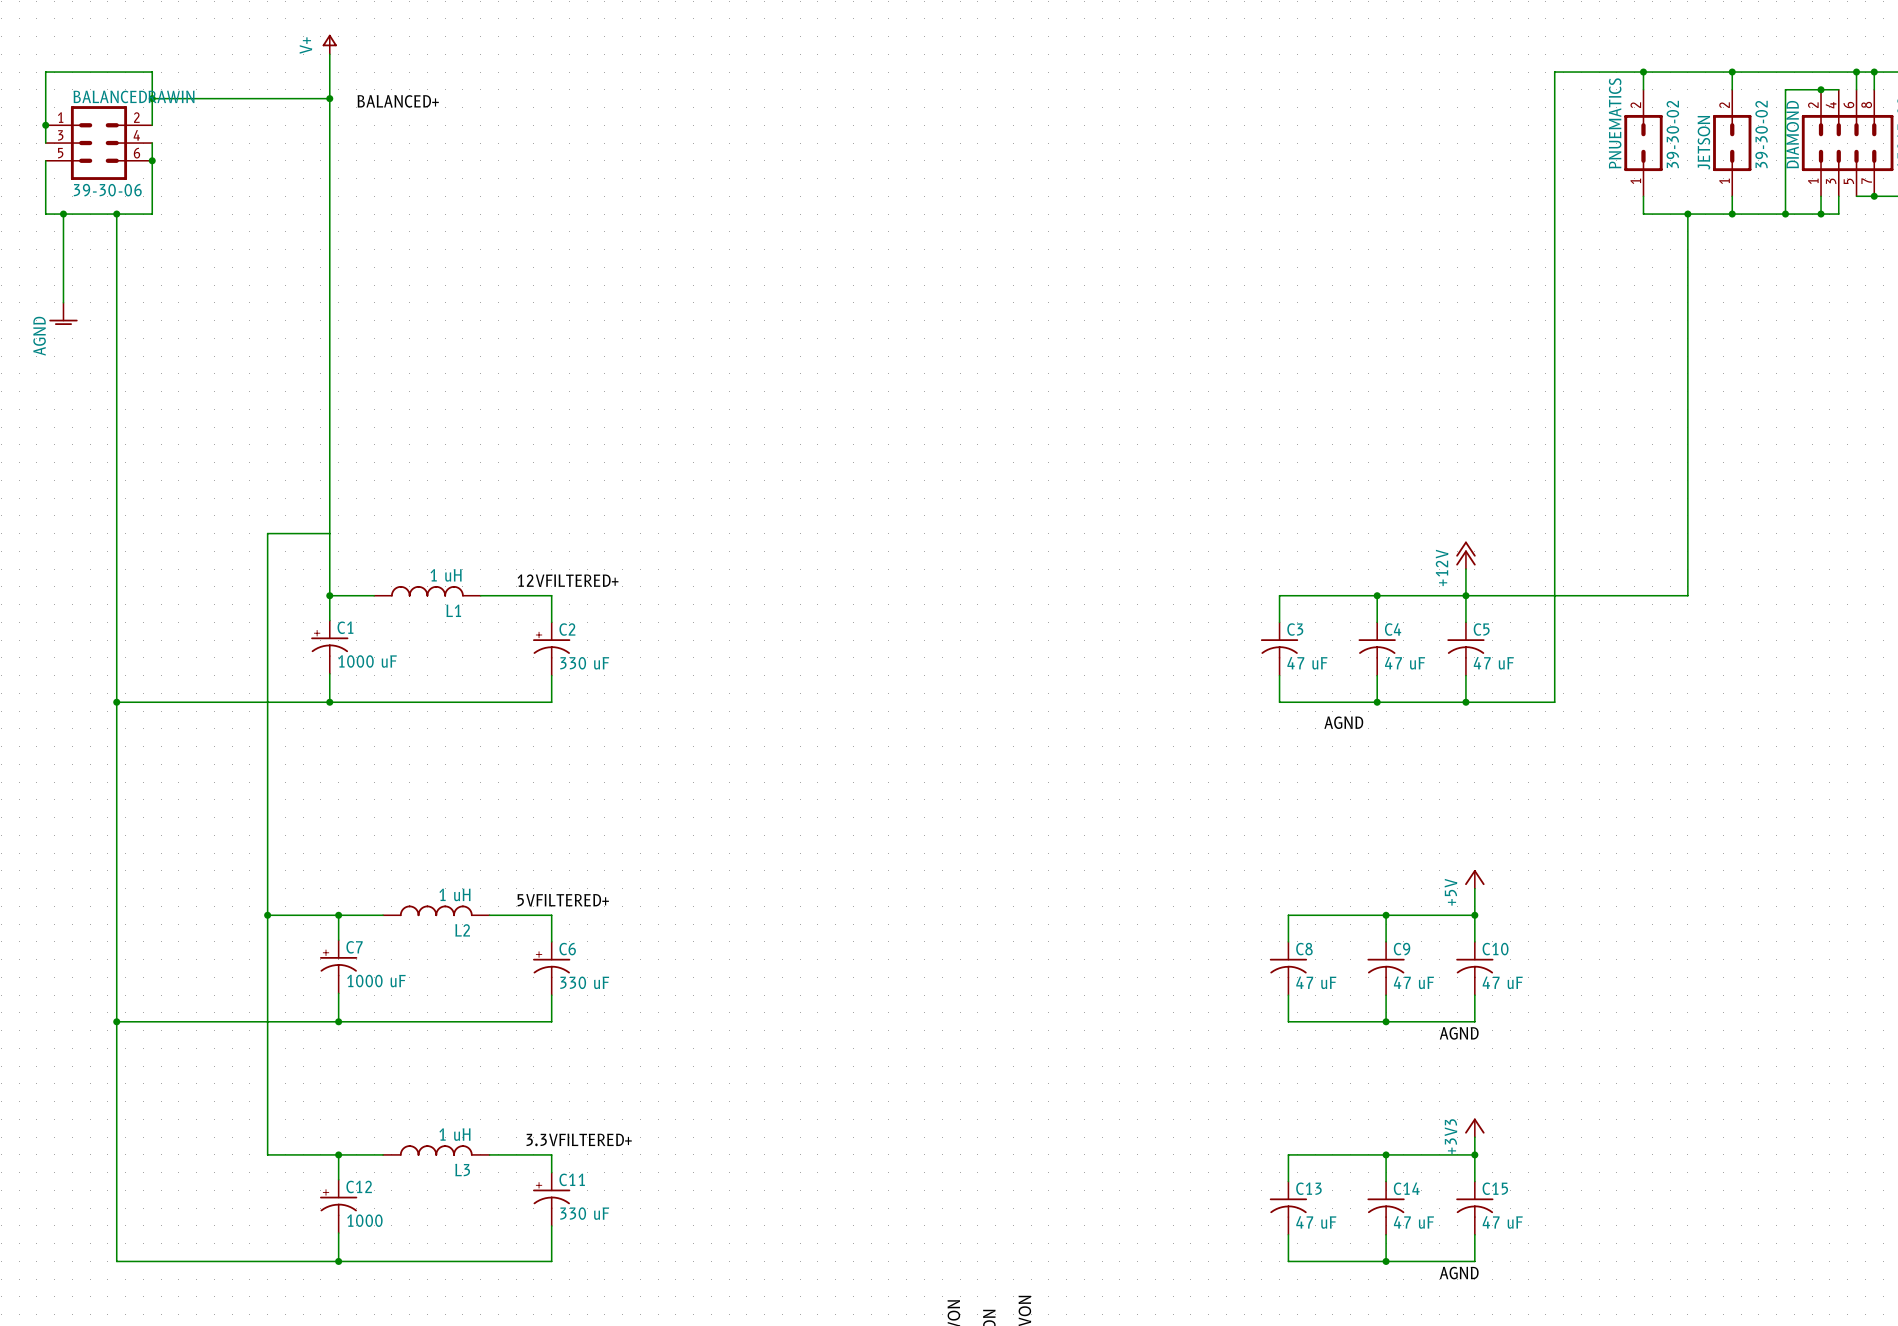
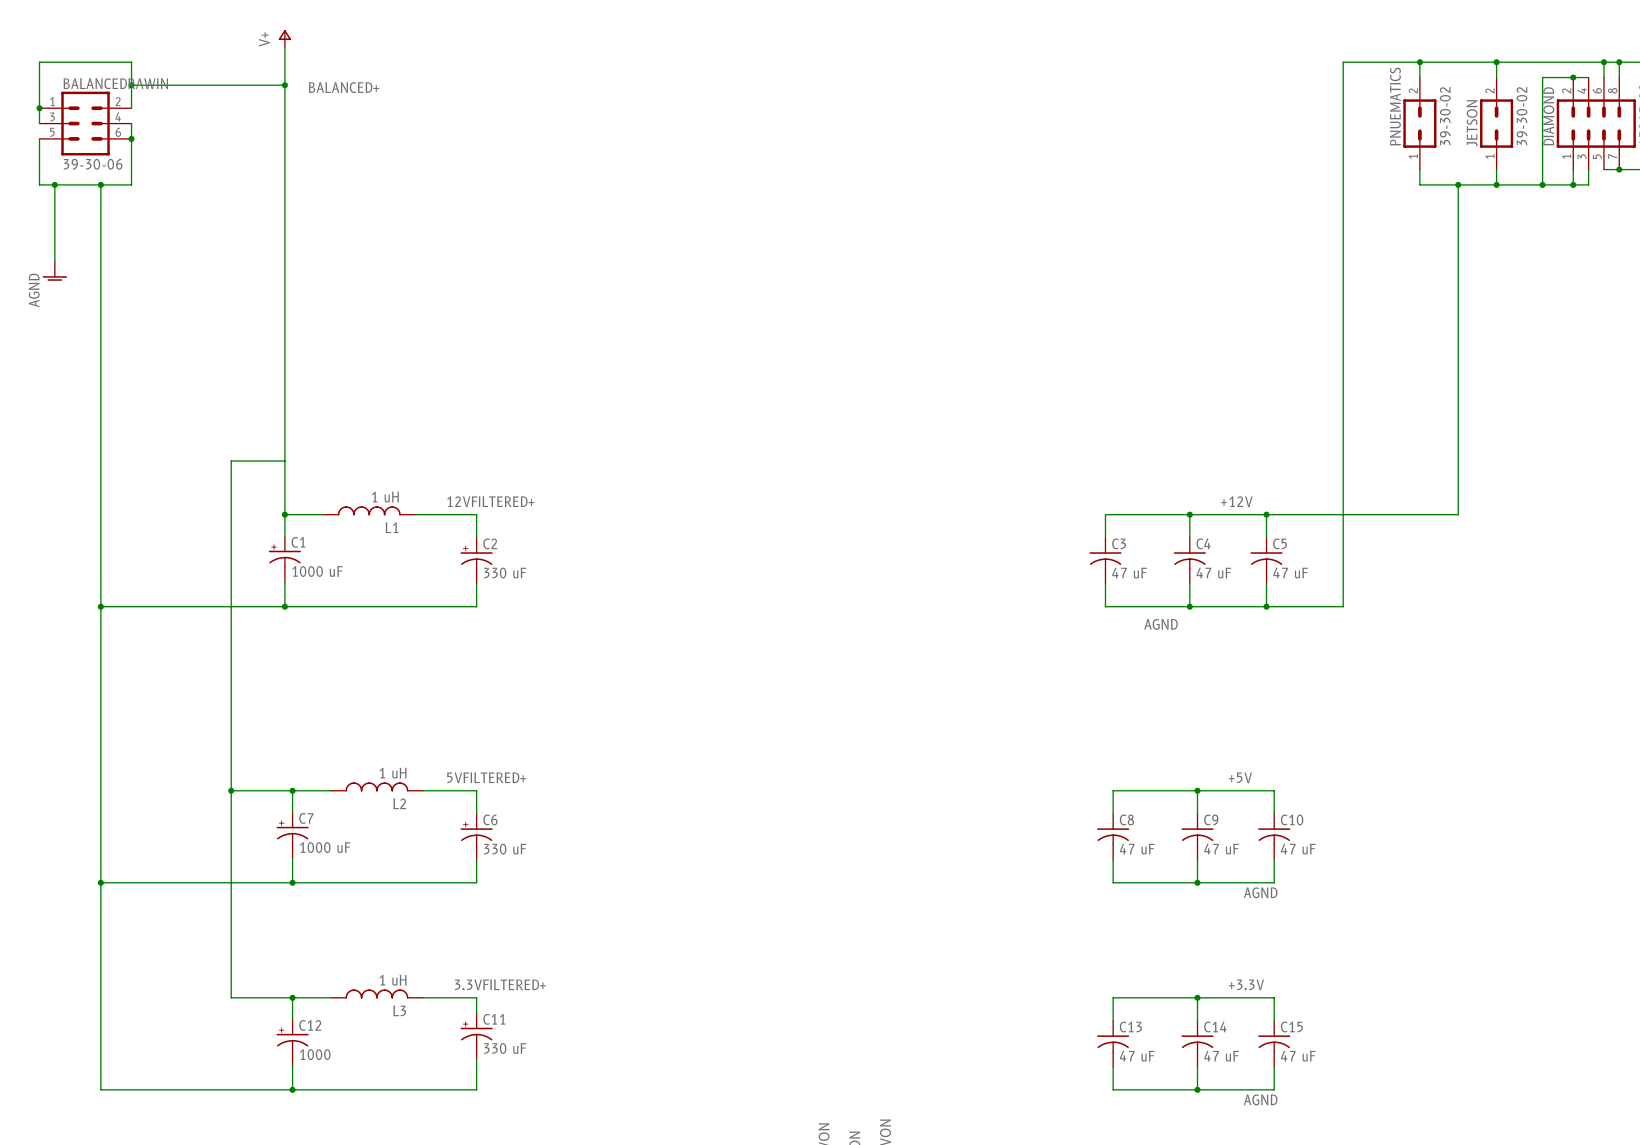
power symbol: +12V (1465, 555) -> none
wire: (1465, 569) (1465, 595) -> none
label: none -> +12V (1236, 501)
power symbol: +5V (1474, 879) -> none
wire: (1474, 888) (1474, 915) -> none
label: none -> +5V (1240, 777)
junction: (1474, 915) -> none
power symbol: +3V3 (1474, 1127) -> none
wire: (1474, 1137) (1474, 1154) -> none
label: none -> +3.3V (1246, 984)
junction: (1474, 1154) -> none

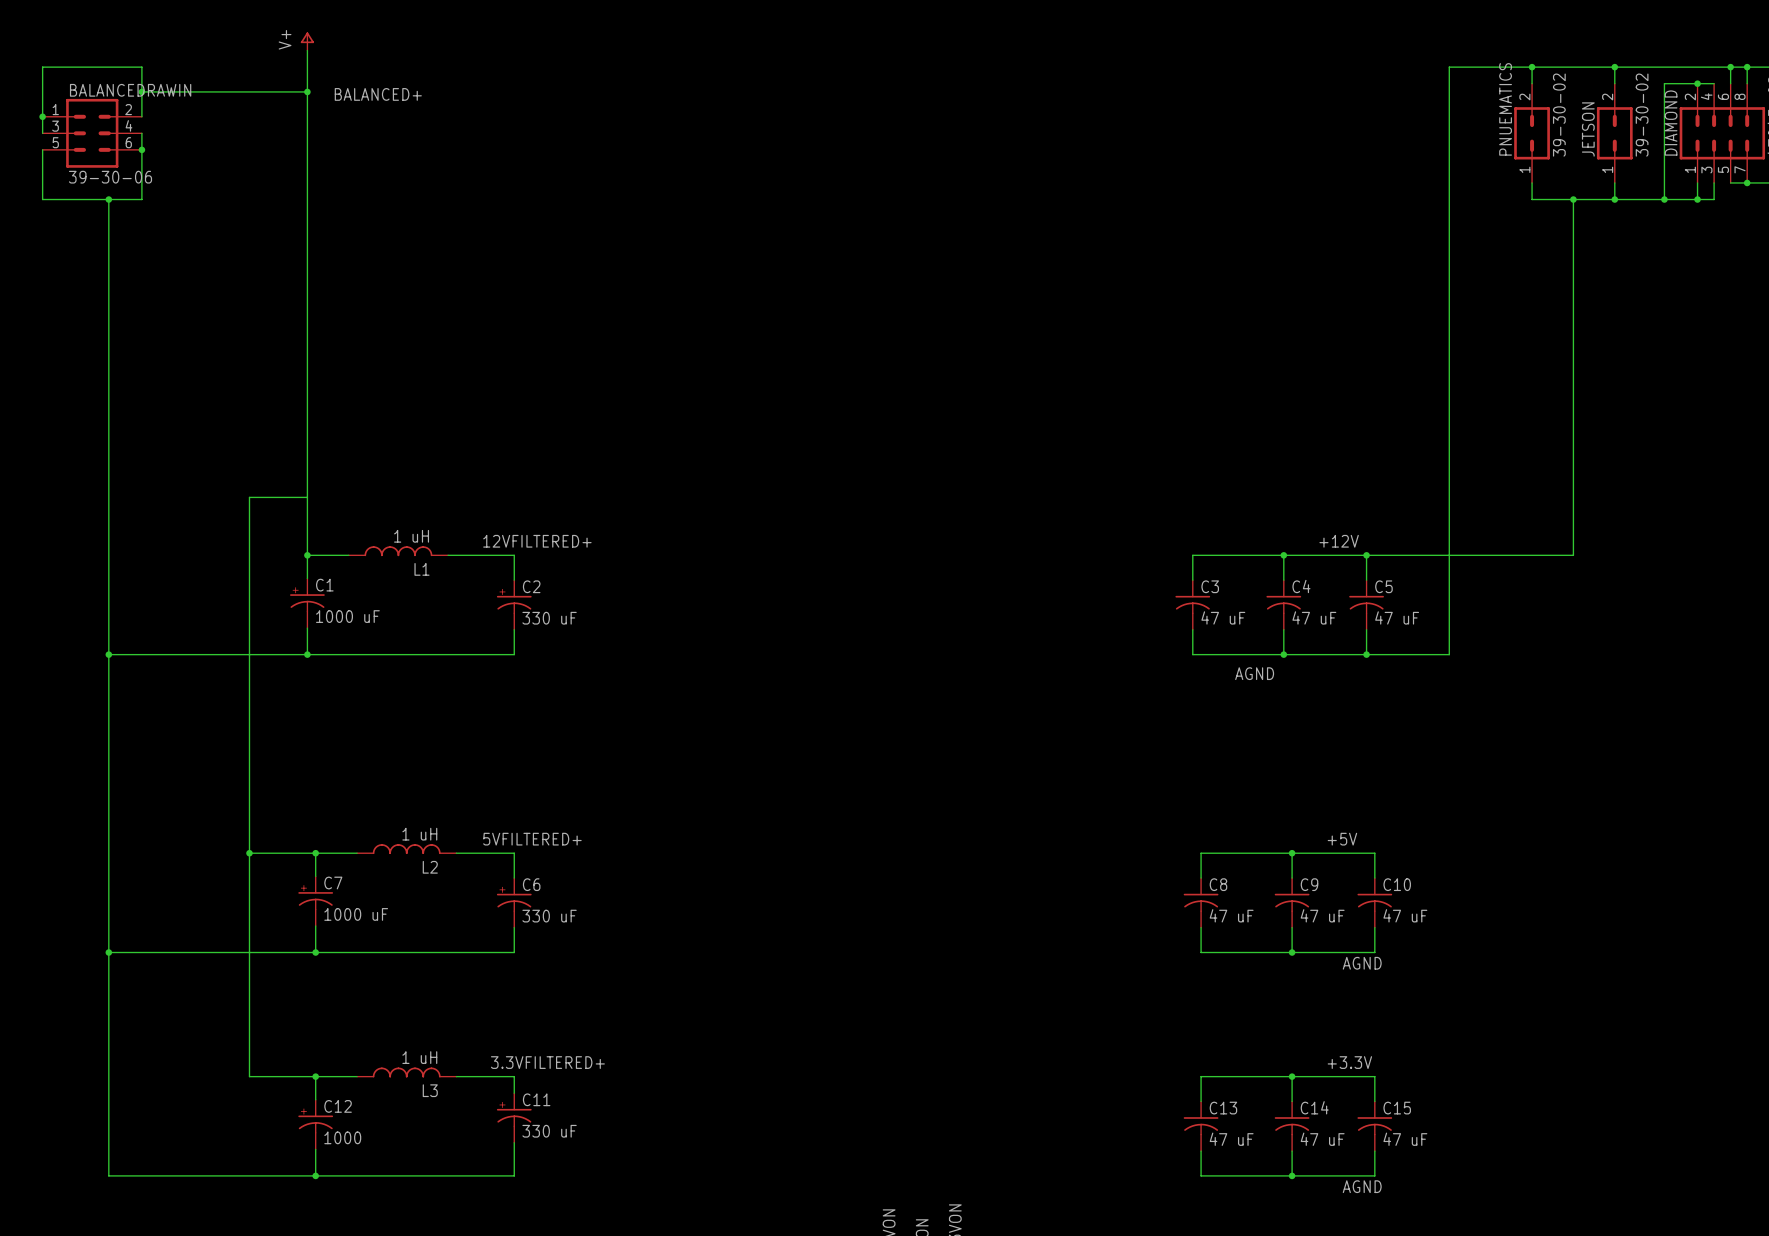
wire: (54, 184) (54, 261) -> none
junction: (54, 184) -> none
power symbol: AGND (54, 271) -> none

